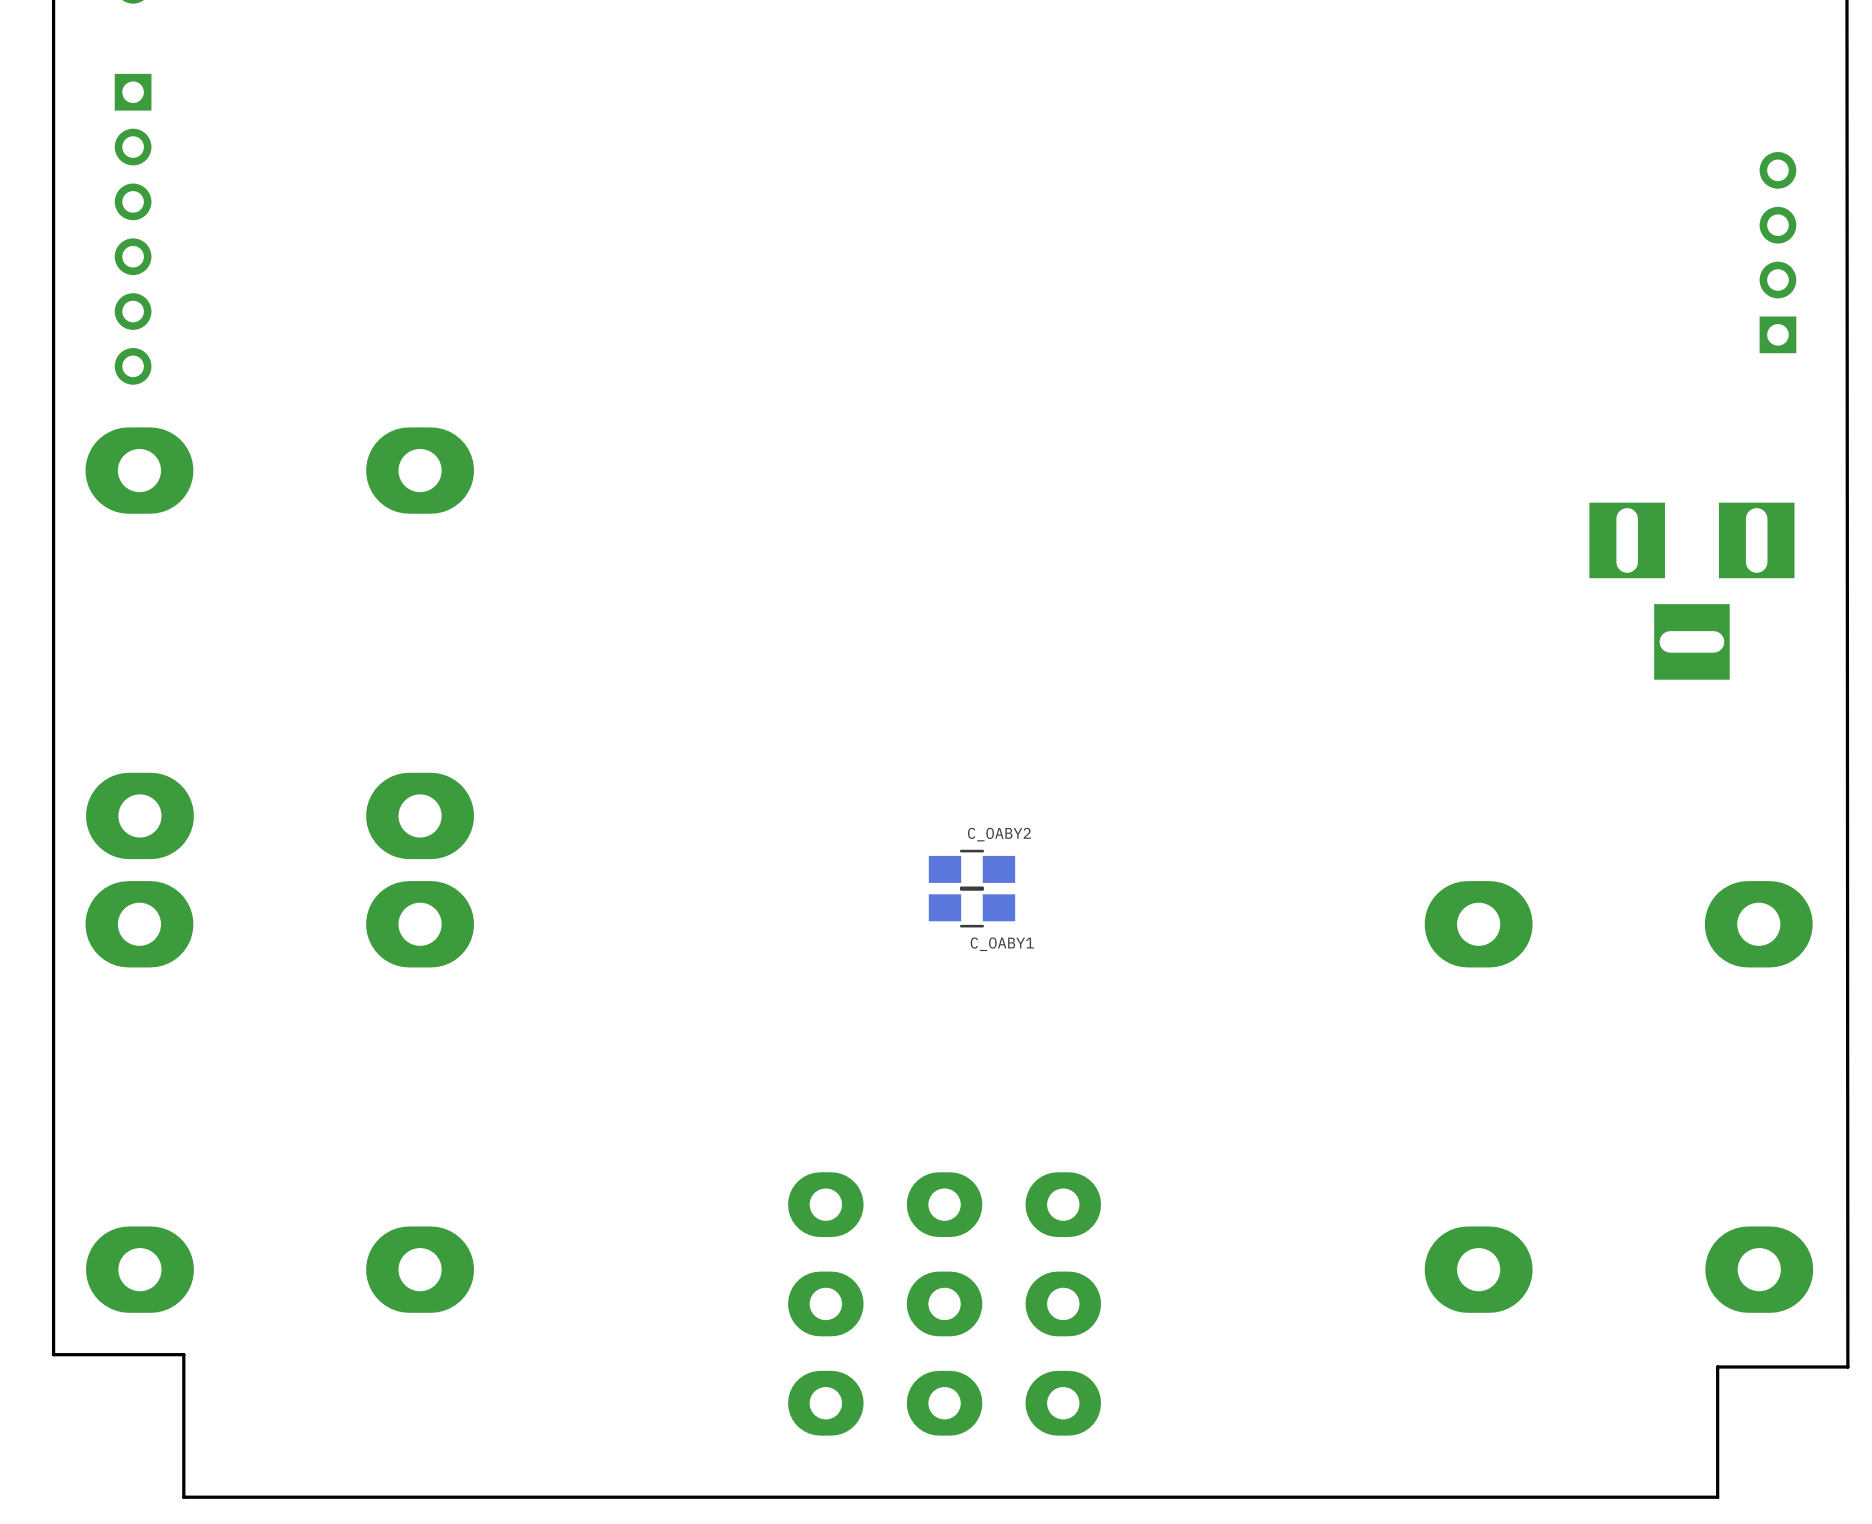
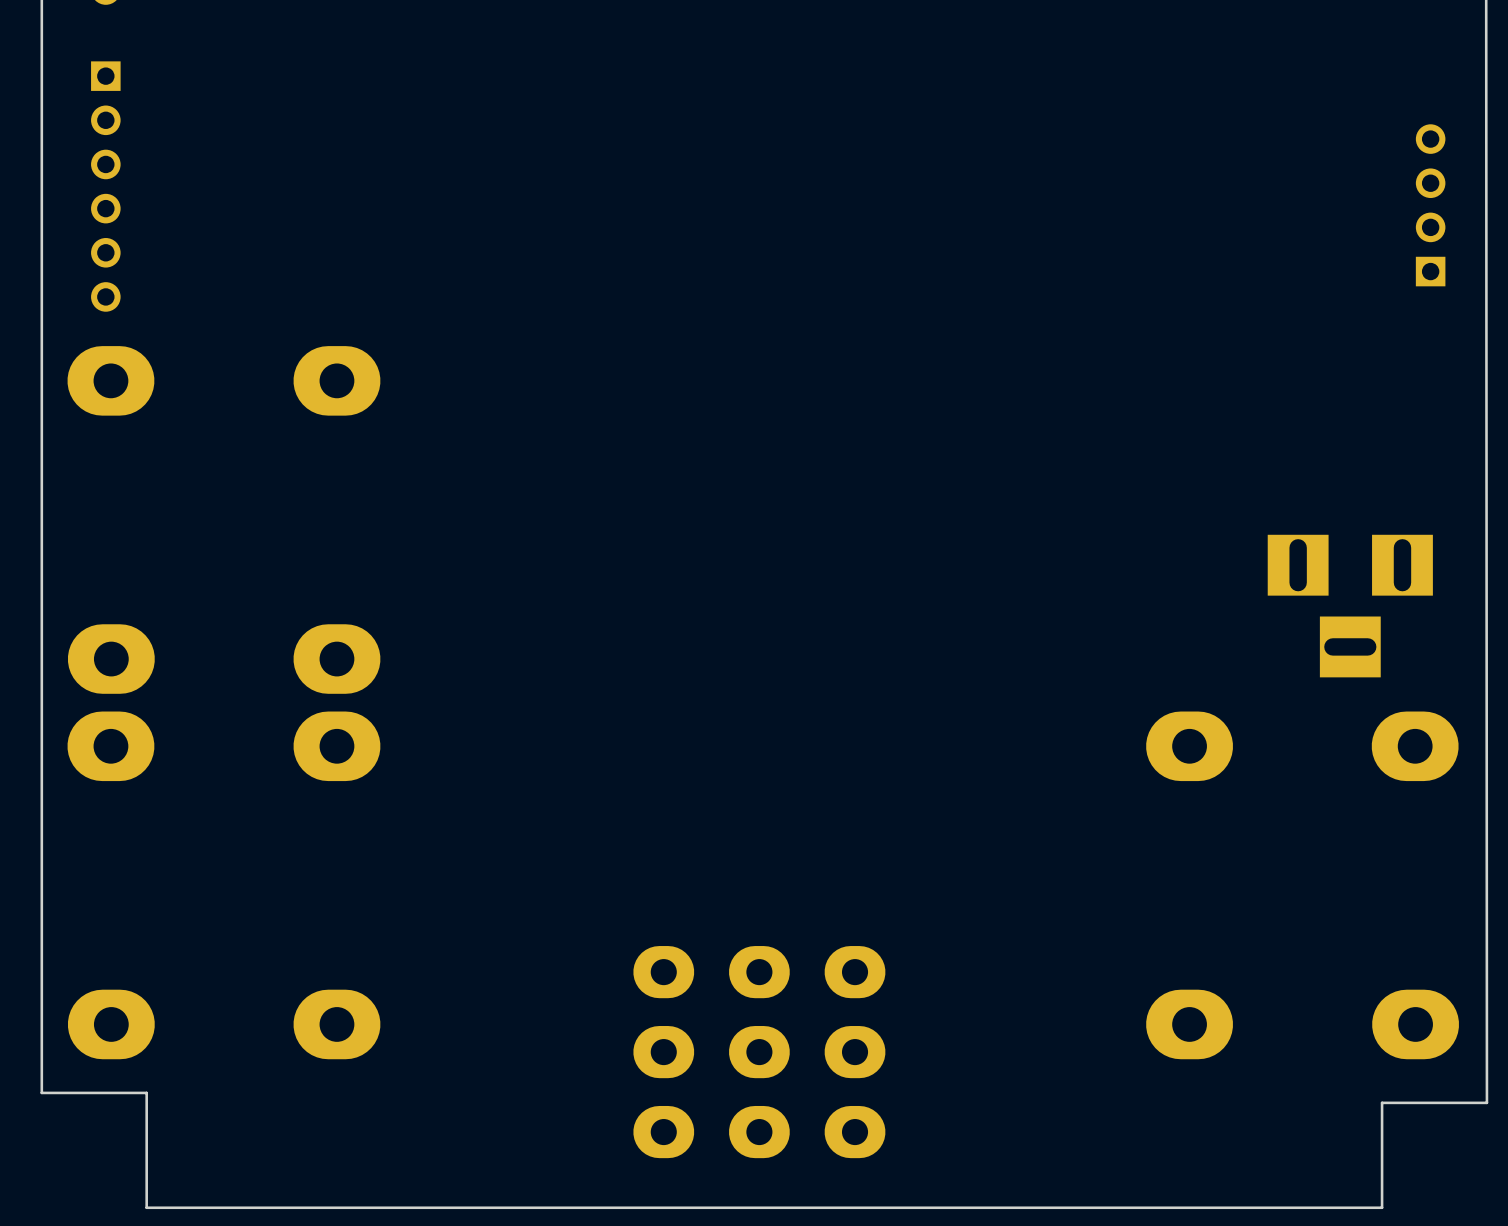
part position: (1691, 591) -> (1350, 606)
C_OABY1: (971, 869) -> none
C_OABY2: (971, 907) -> none

